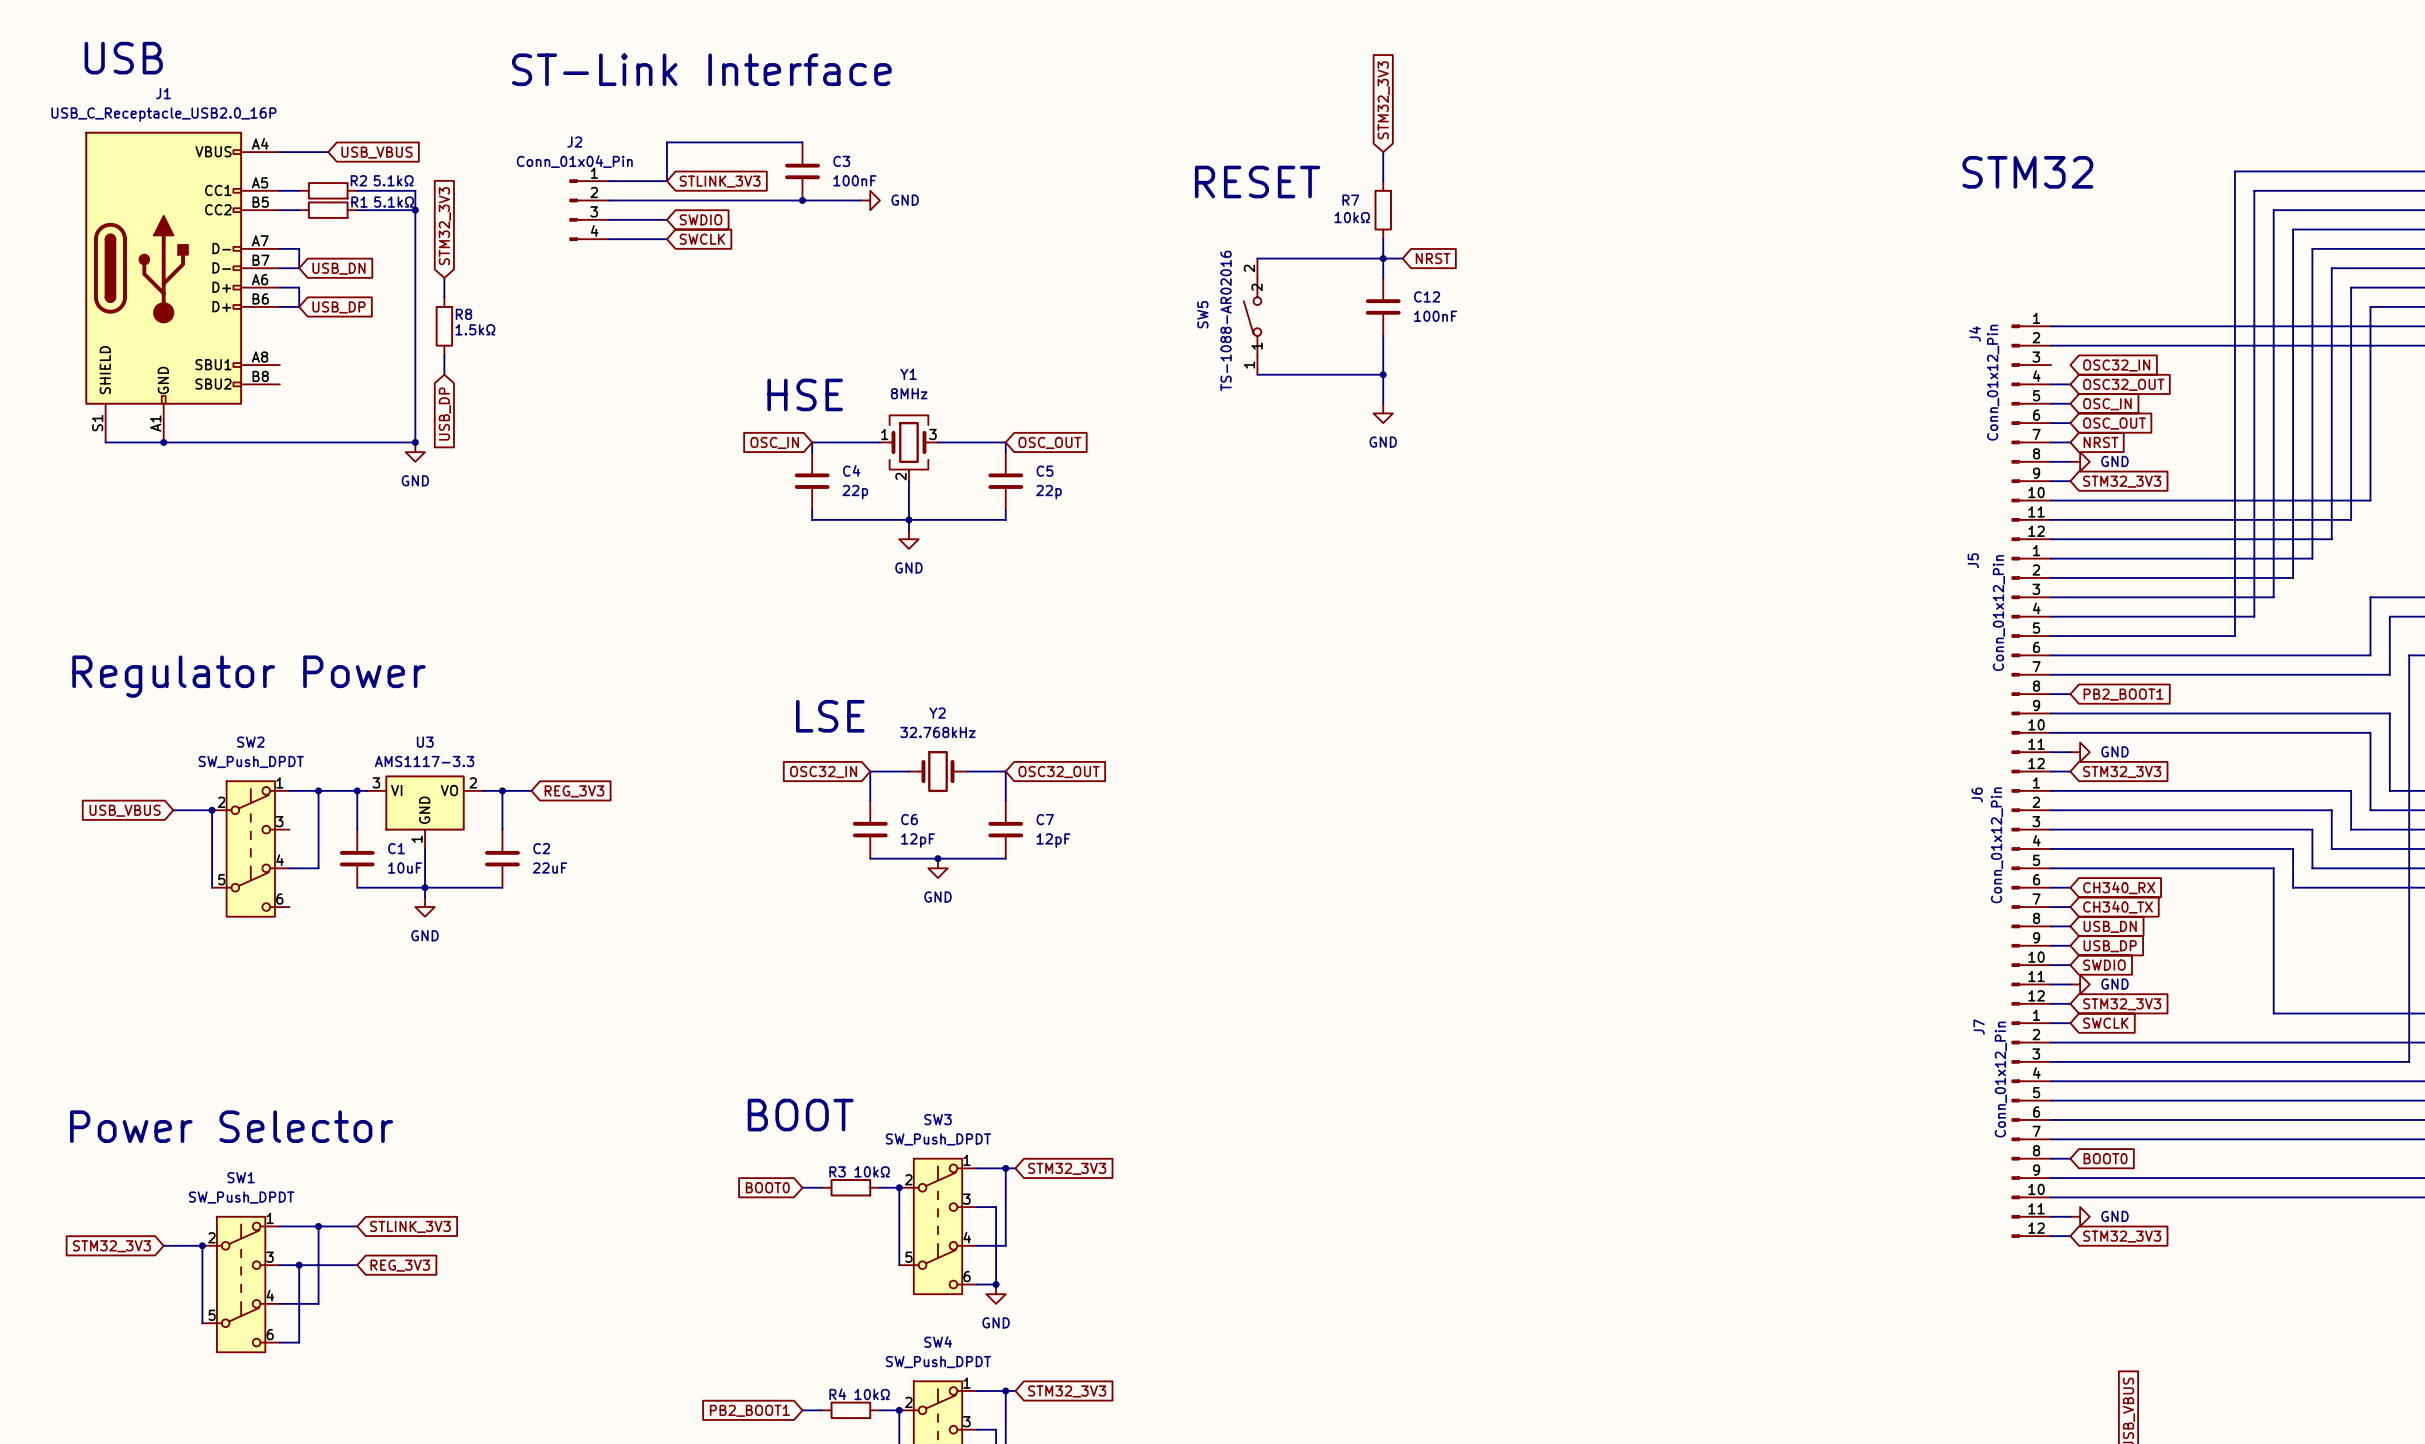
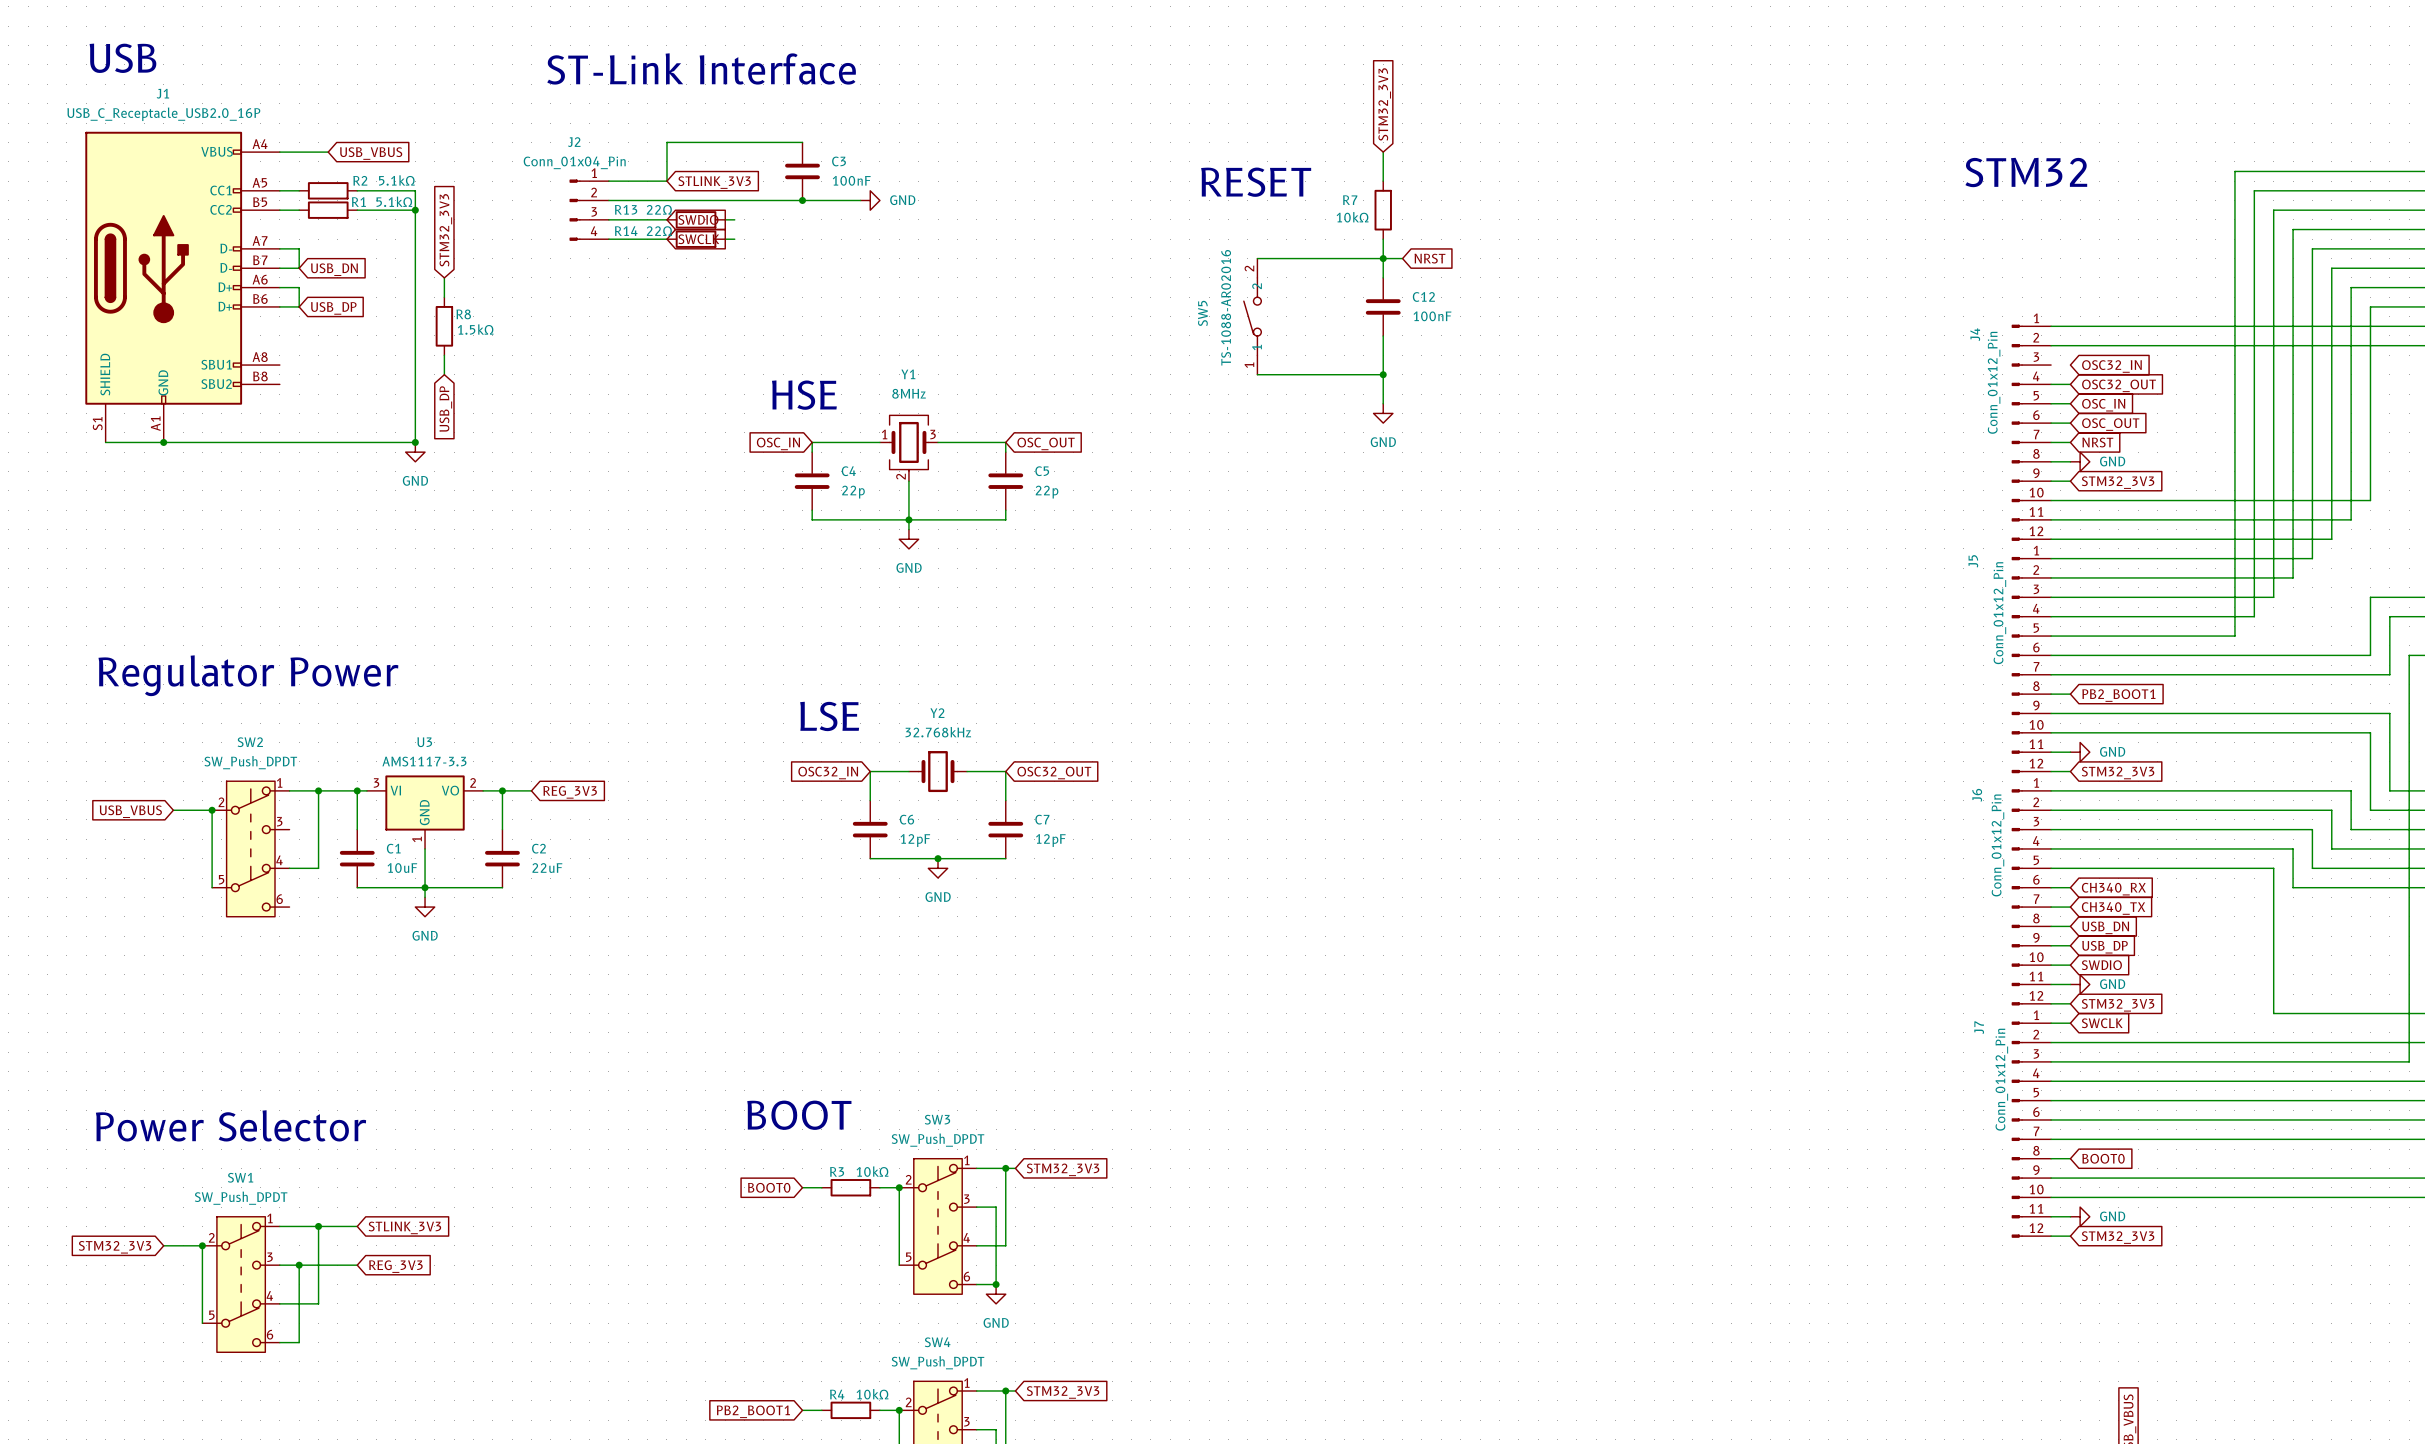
R13: none -> 22Ω (696, 219)
wire: none -> (725, 219) (734, 219)
R14: none -> 22Ω (696, 239)
wire: none -> (725, 239) (734, 239)

